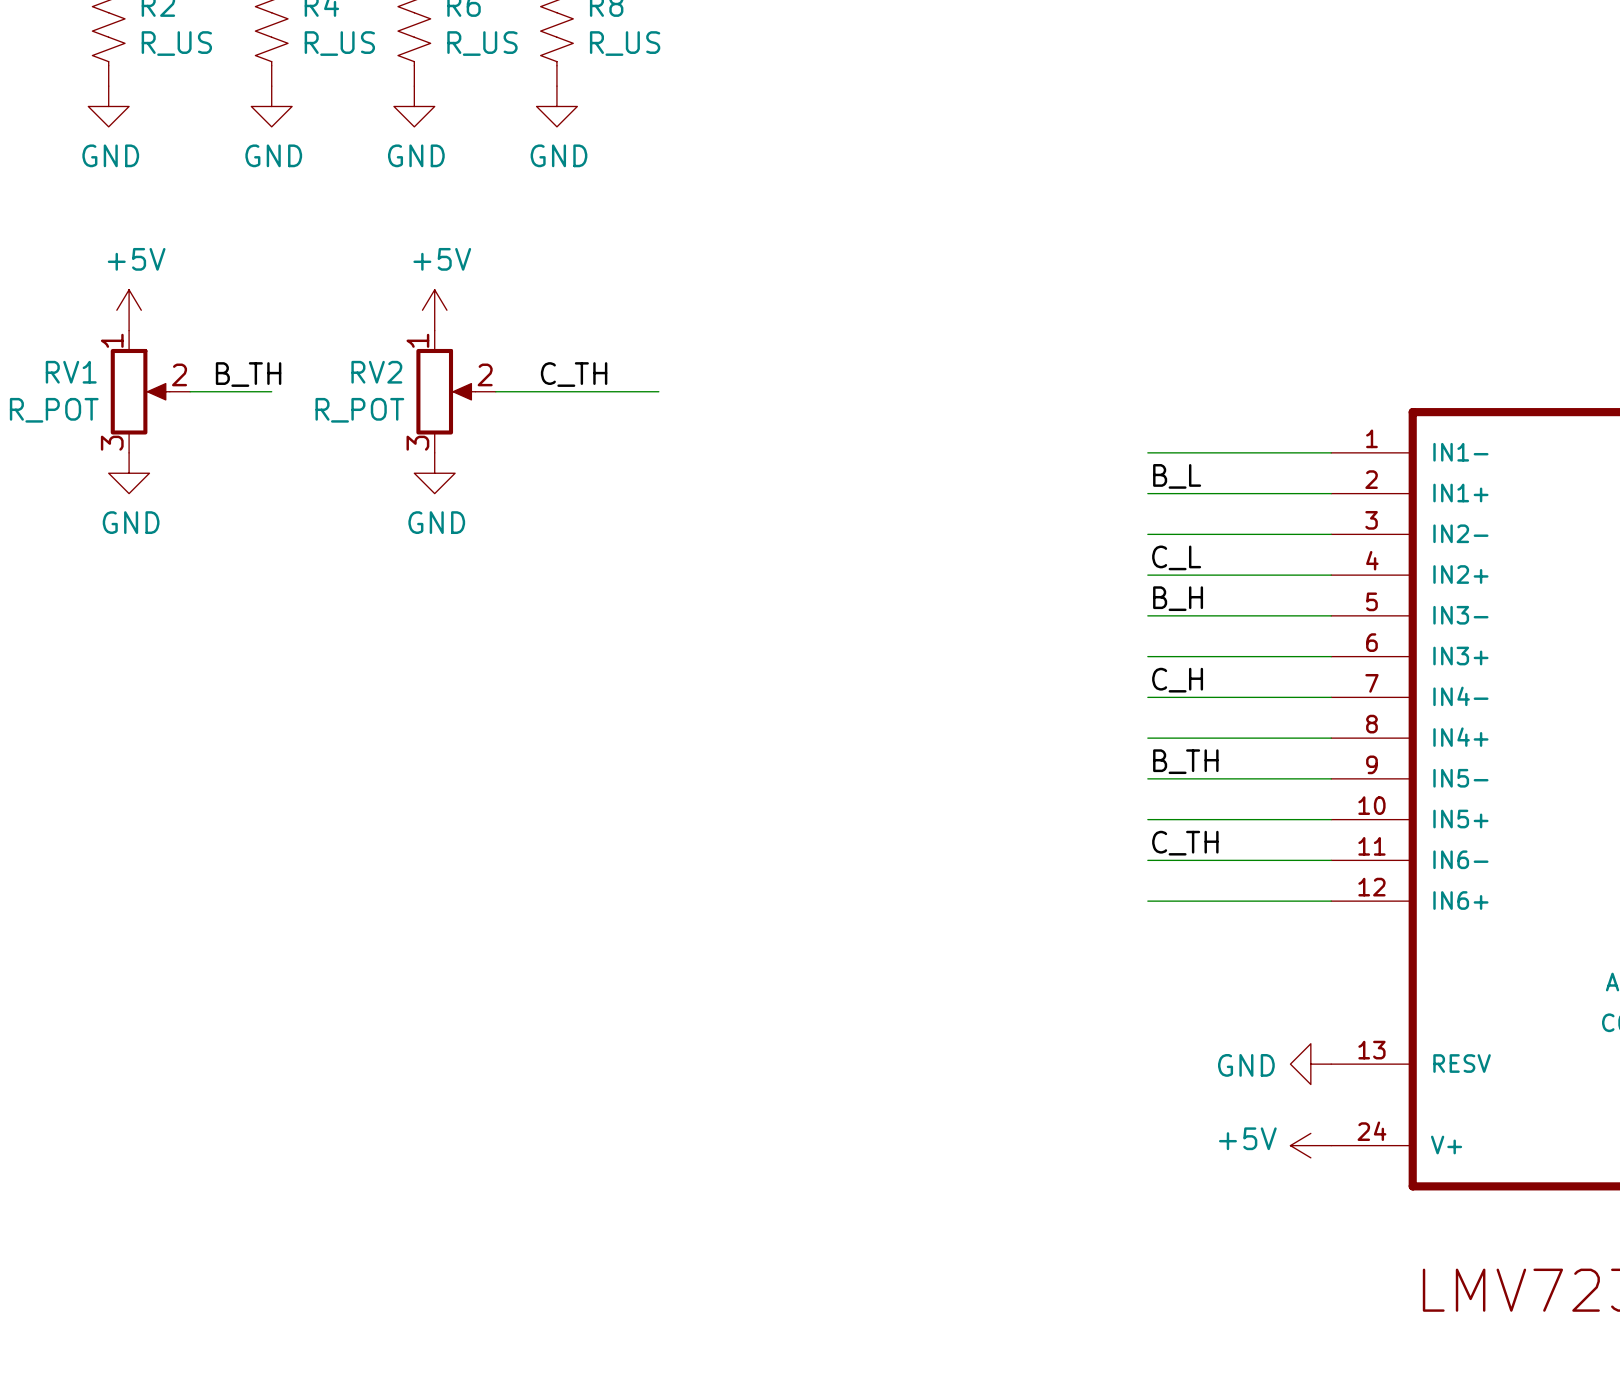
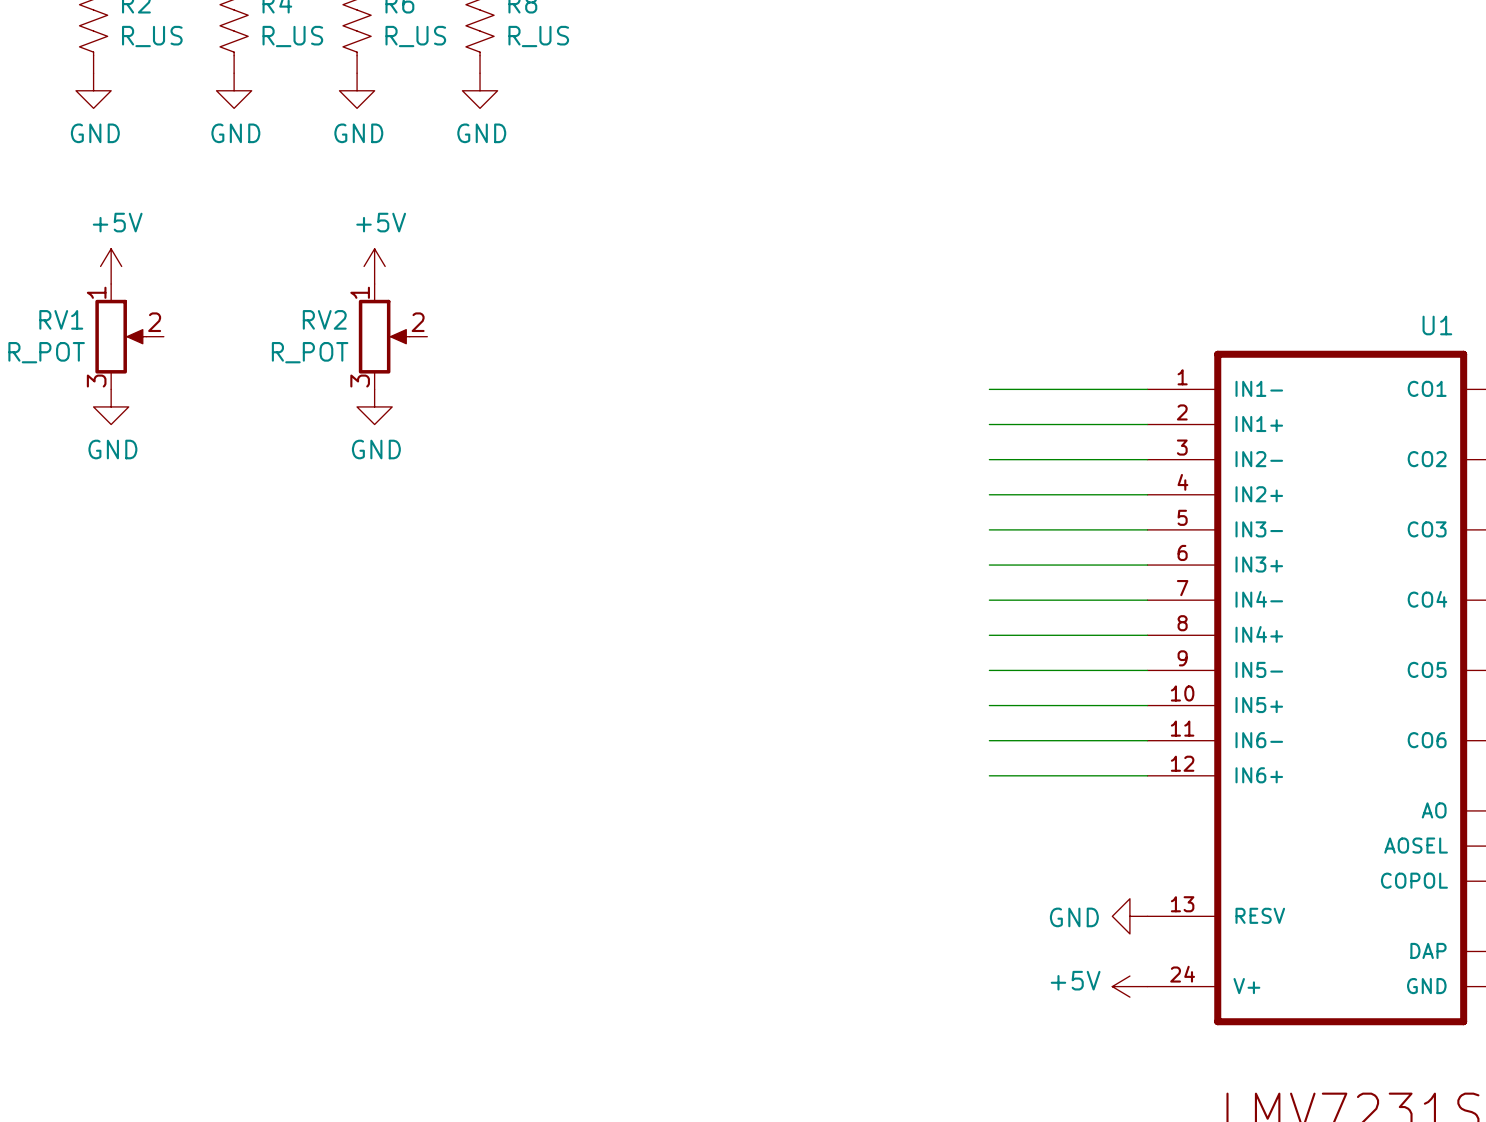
label: B_TH (248, 374) -> none
label: C_TH (574, 374) -> none
wire: (190, 391) (271, 391) -> none
wire: (495, 391) (658, 391) -> none
label: B_L (1177, 476) -> none
label: C_L (1176, 557) -> none
label: B_H (1178, 598) -> none
label: C_H (1177, 680) -> none
label: B_TH (1185, 761) -> none
label: C_TH (1185, 843) -> none

